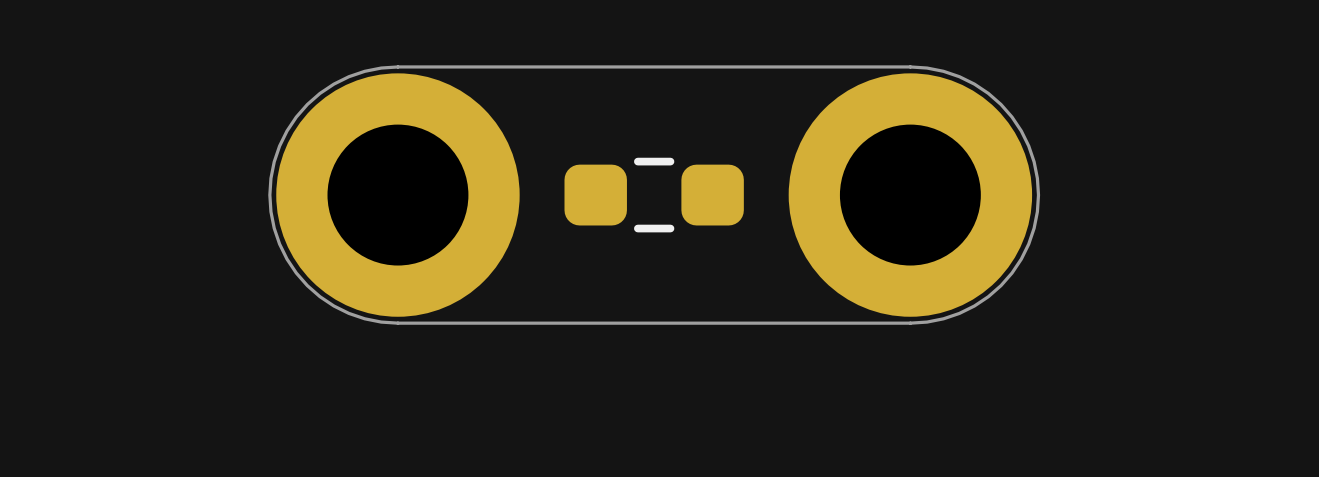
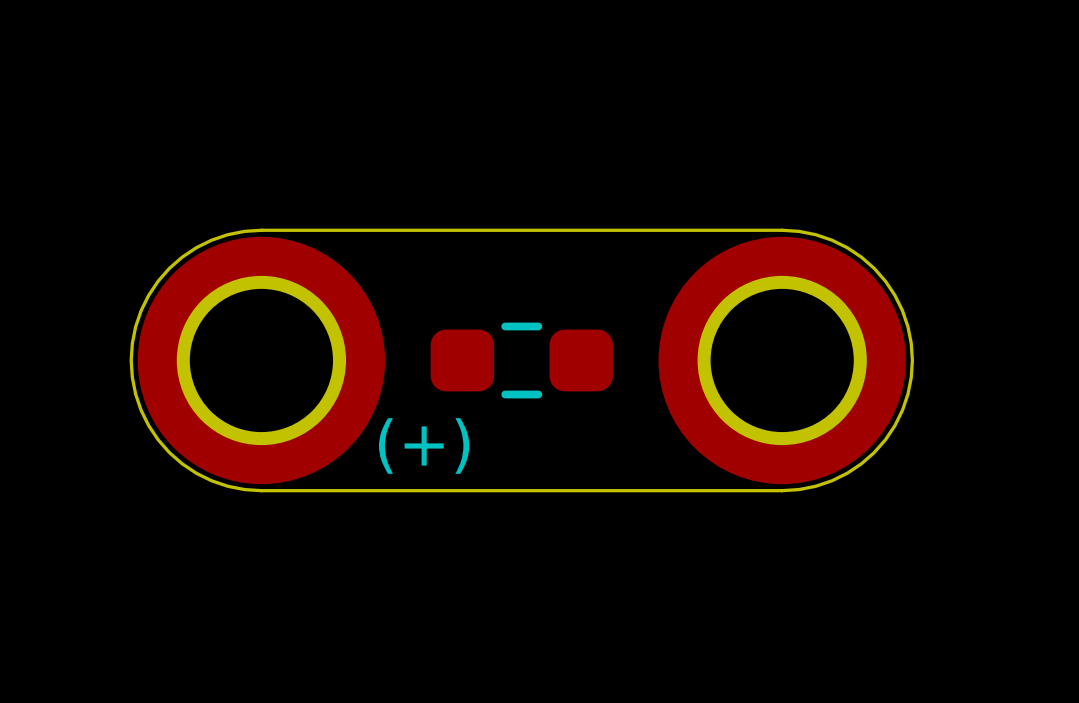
text: none -> (+) (424, 445)

